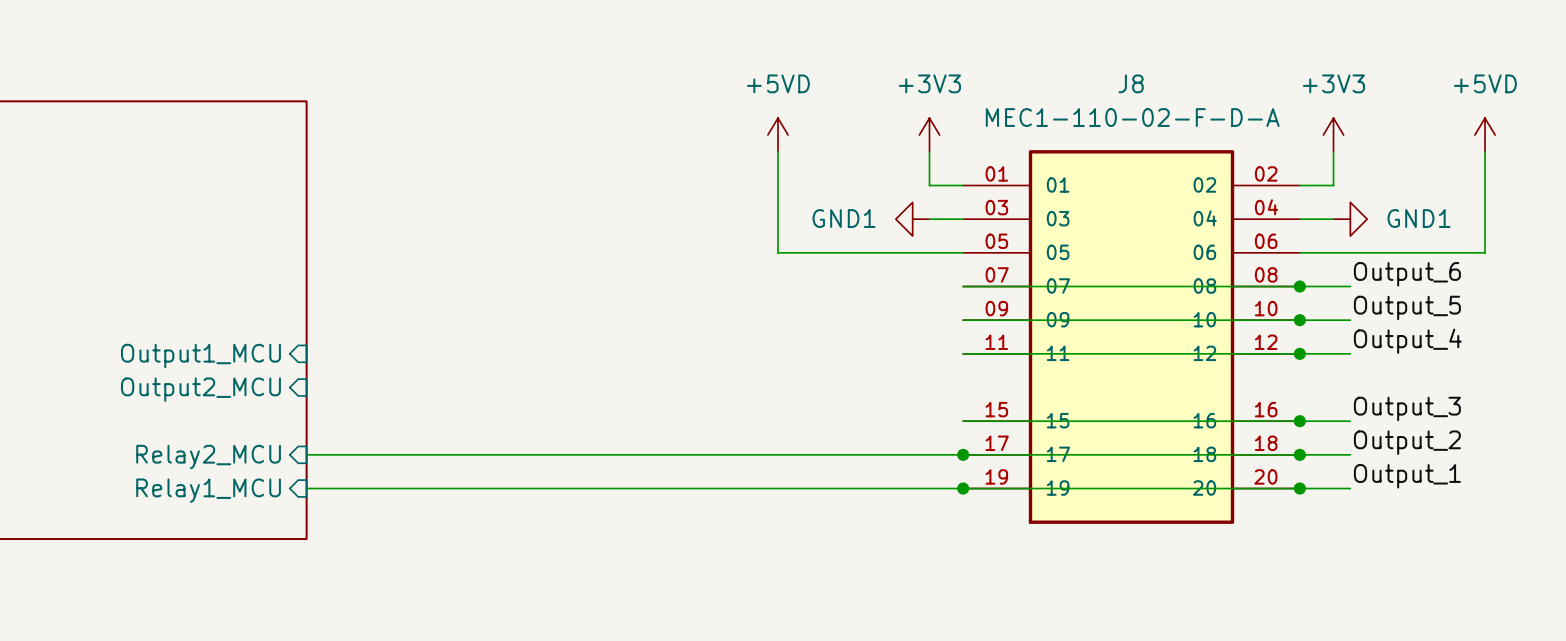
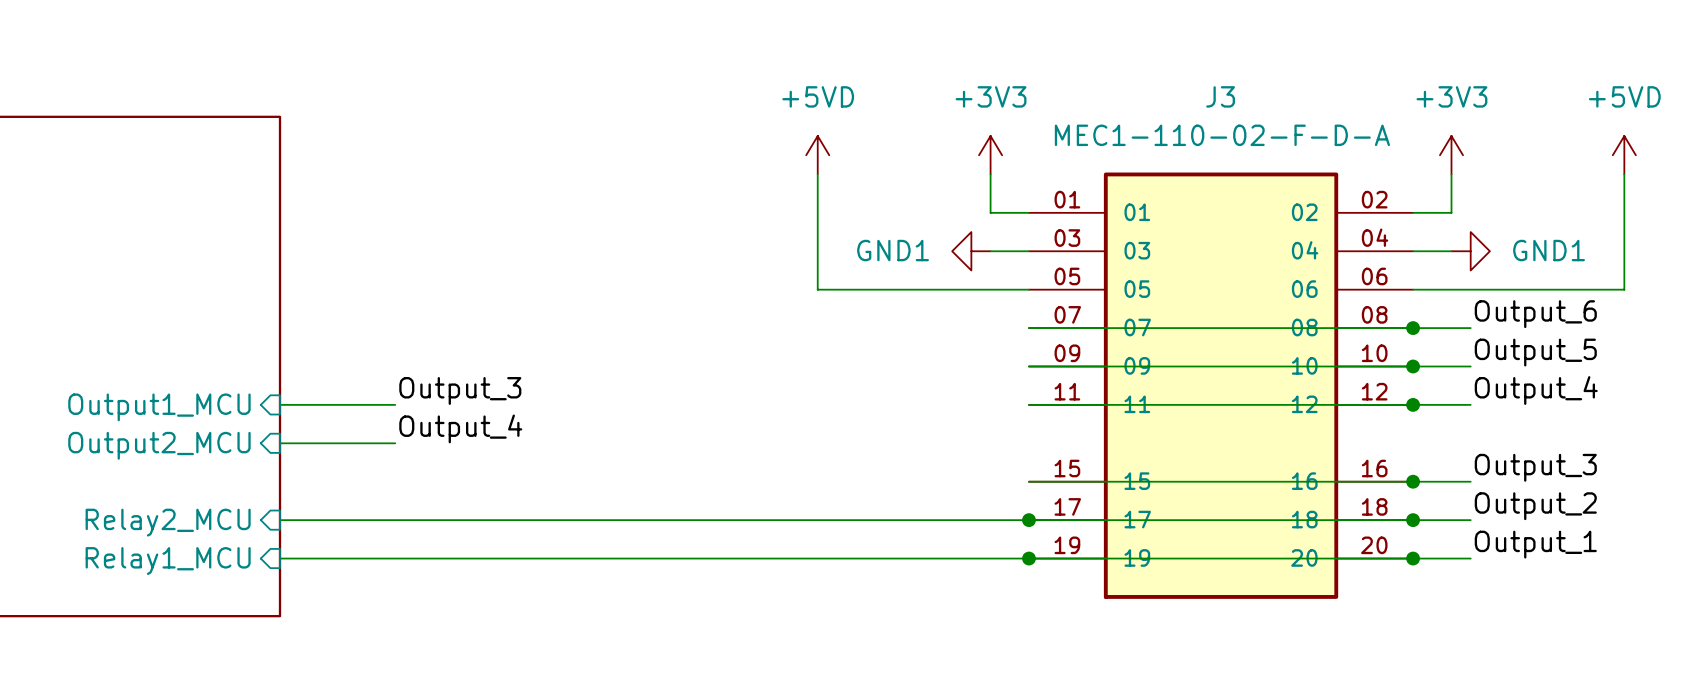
J8 name: J8 (1131, 83) -> J3 (1220, 96)
label: none -> Output_3 (460, 390)
wire: none -> (280, 404) (395, 404)
label: none -> Output_4 (460, 428)
wire: none -> (280, 443) (395, 443)

